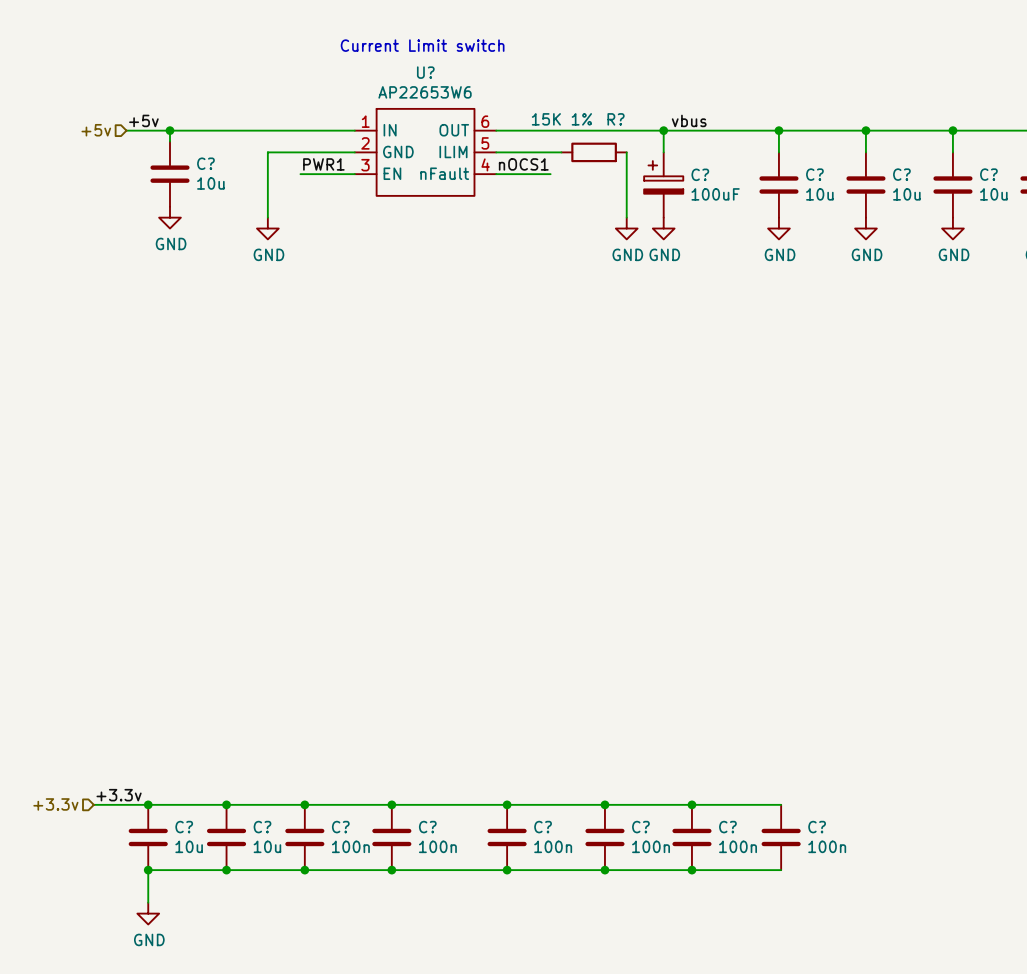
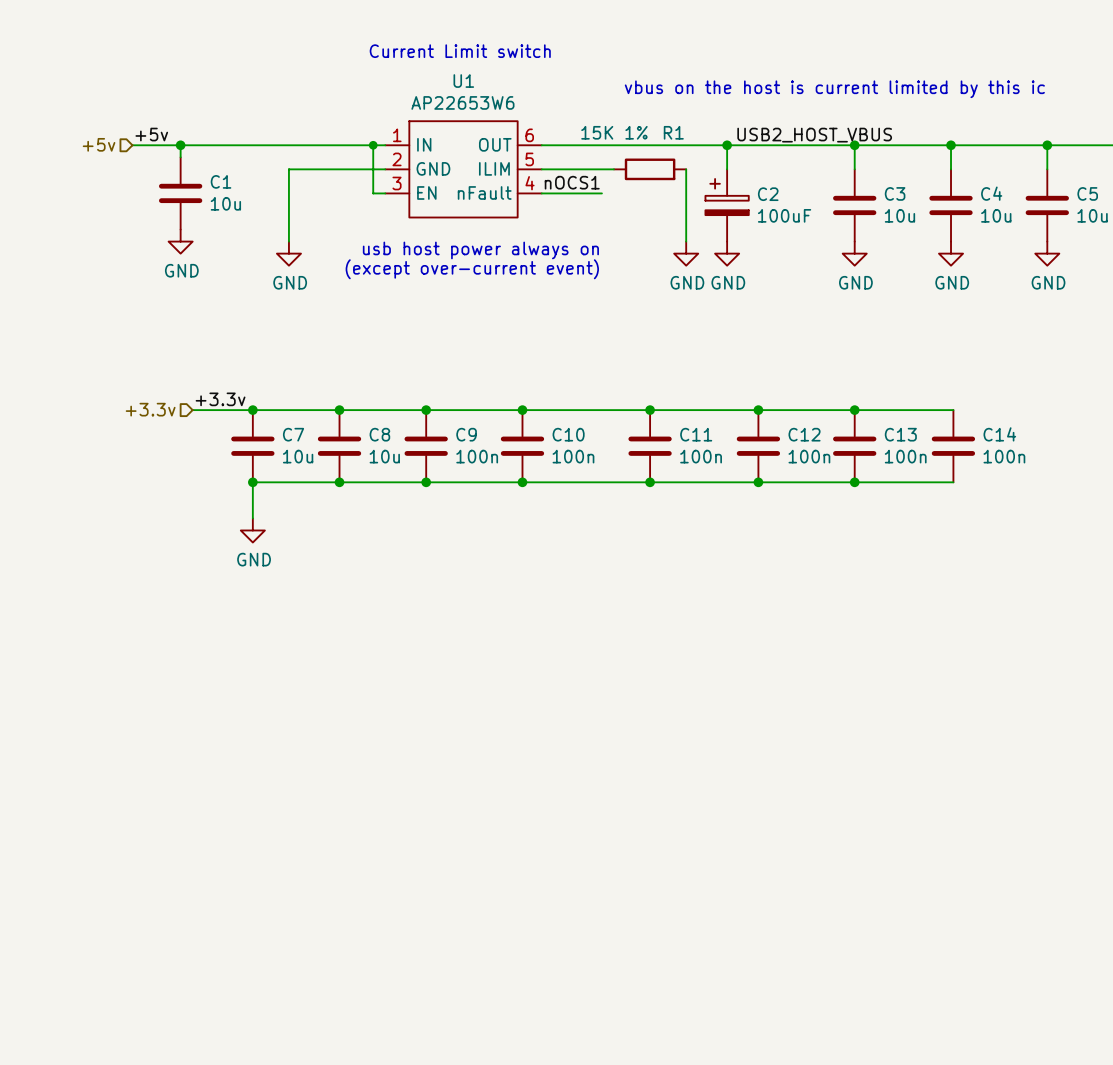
U? name: U? (425, 72) -> U1 (463, 81)
text: none -> vbus on the host is current limited by this ic (834, 89)
R? name: R? (616, 119) -> R1 (673, 132)
label: vbus (689, 120) -> USB2_HOST_VBUS (814, 135)
junction: none -> (373, 145)
C? name: C? (205, 163) -> C1 (221, 181)
label: PWR1 (323, 164) -> none
wire: (300, 174) (343, 174) -> (373, 145) (373, 193)
C? name: C? (700, 174) -> C2 (768, 194)
C? name: C? (814, 174) -> C3 (895, 193)
C? name: C? (901, 174) -> C4 (991, 193)
C? name: C? (988, 174) -> C5 (1087, 193)
text: none -> usb host power always on (480, 250)
text: none -> (except over-current event) (472, 269)
label: none -> +3.3v (220, 399)
hierarchical label: none -> +3.3v (150, 409)
wire: none -> (192, 410) (953, 410)
junction: none -> (252, 410)
junction: none -> (339, 410)
junction: none -> (426, 410)
junction: none -> (522, 410)
junction: none -> (650, 410)
junction: none -> (758, 410)
junction: none -> (854, 410)
C7: none -> 10u (252, 446)
C8: none -> 10u (339, 446)
C9: none -> 100n (426, 446)
C10: none -> 100n (522, 446)
C11: none -> 100n (650, 446)
C12: none -> 100n (758, 446)
C13: none -> 100n (854, 446)
C14: none -> 100n (953, 446)
junction: none -> (252, 482)
junction: none -> (339, 482)
junction: none -> (426, 482)
junction: none -> (522, 482)
junction: none -> (650, 482)
junction: none -> (758, 482)
junction: none -> (854, 482)
wire: none -> (953, 482) (252, 482) (252, 518)
power symbol: none -> GND (252, 530)
label: +3.3v (119, 795) -> none
hierarchical label: +3.3v (55, 804) -> none
wire: (93, 804) (781, 804) -> none
junction: (148, 804) -> none
junction: (226, 804) -> none
junction: (304, 804) -> none
junction: (391, 804) -> none
junction: (507, 804) -> none
junction: (604, 804) -> none
junction: (691, 804) -> none
C?: 10u (148, 837) -> none
C?: 10u (226, 837) -> none
C?: 100n (304, 837) -> none
C?: 100n (391, 837) -> none
C?: 100n (507, 837) -> none
C?: 100n (604, 837) -> none
C?: 100n (691, 837) -> none
C?: 100n (781, 837) -> none
junction: (148, 870) -> none
junction: (226, 870) -> none
junction: (304, 870) -> none
junction: (391, 870) -> none
junction: (507, 870) -> none
junction: (604, 870) -> none
junction: (691, 870) -> none
wire: (781, 870) (148, 870) (148, 902) -> none
power symbol: GND (148, 913) -> none

